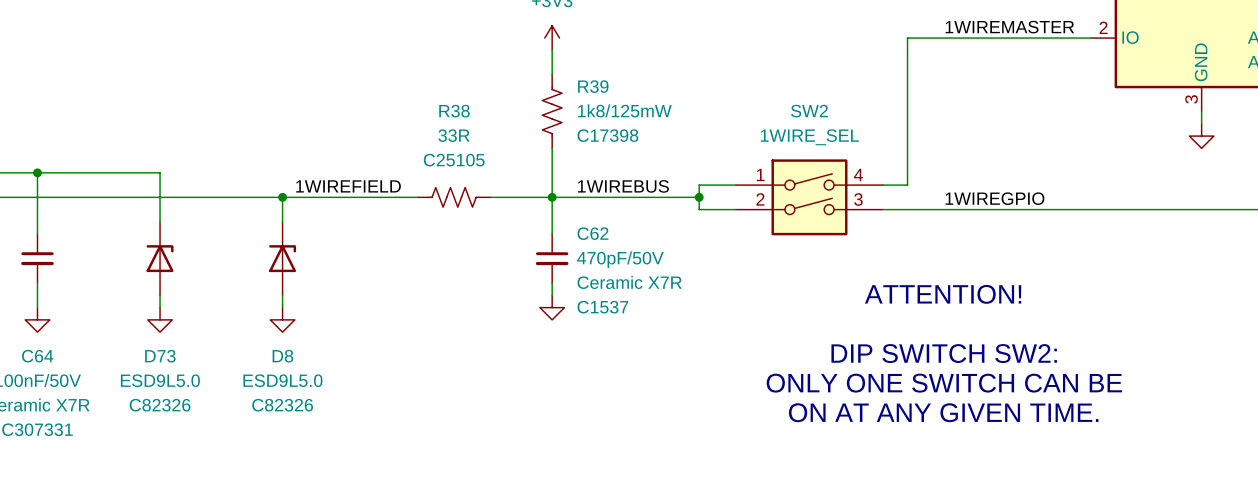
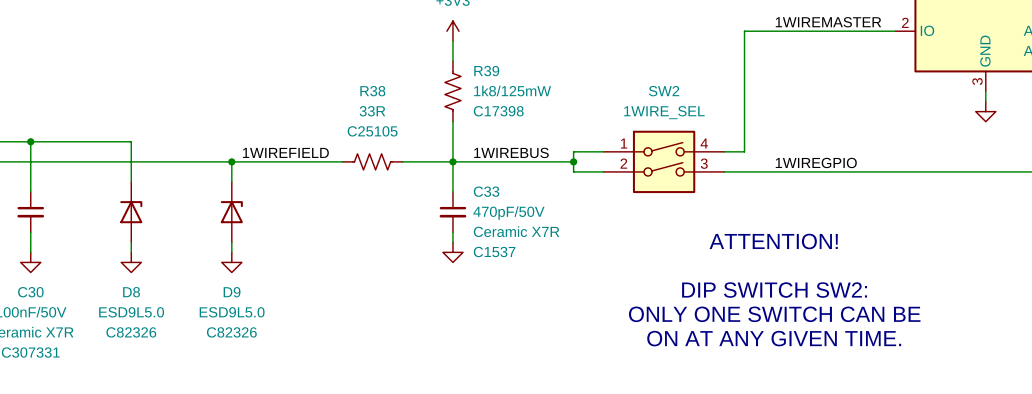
C62 name: C62 (593, 233) -> C33 (486, 191)
C64 name: C64 (37, 356) -> C30 (30, 292)
D73 name: D73 (160, 356) -> D8 (131, 292)
D8 name: D8 (282, 356) -> D9 (232, 292)

